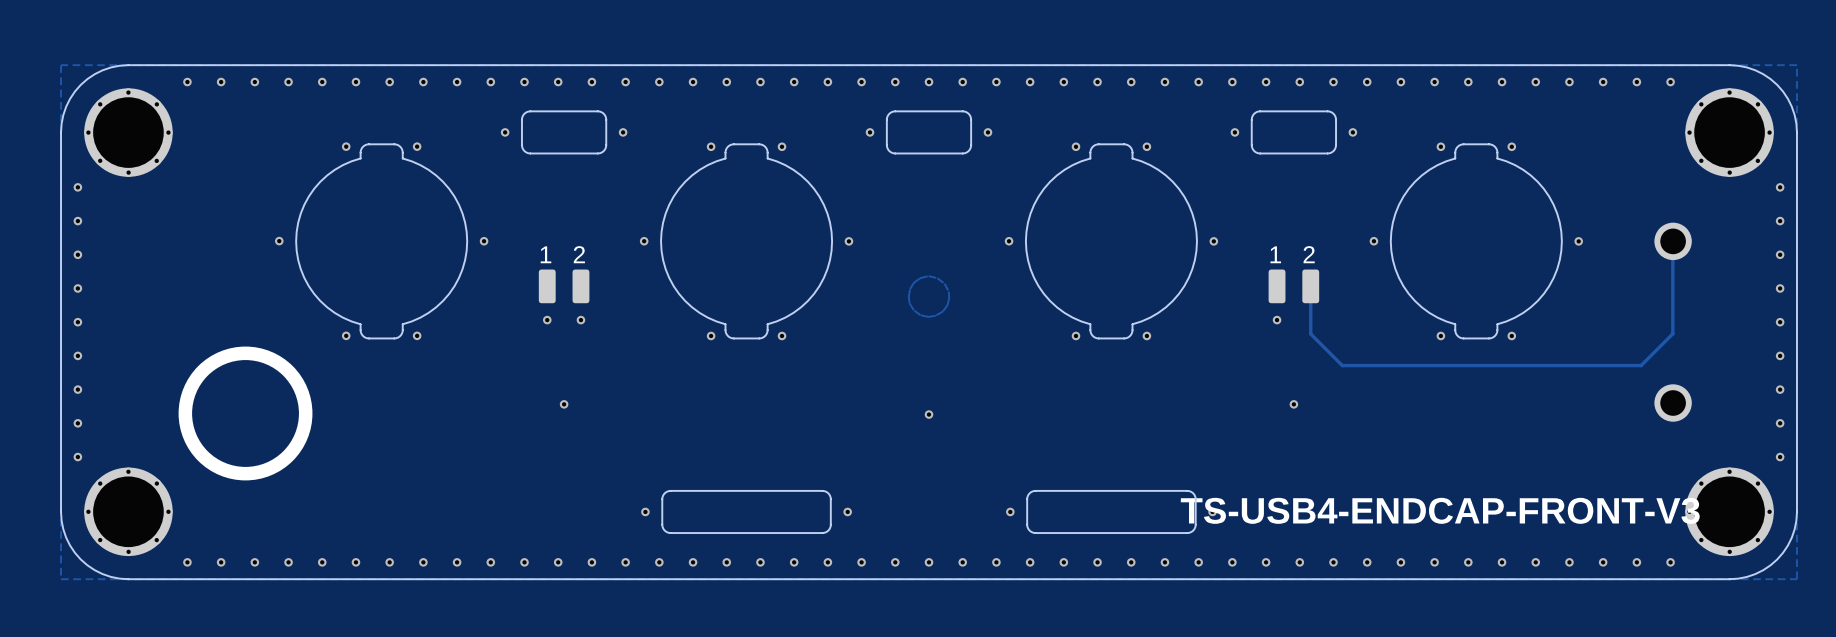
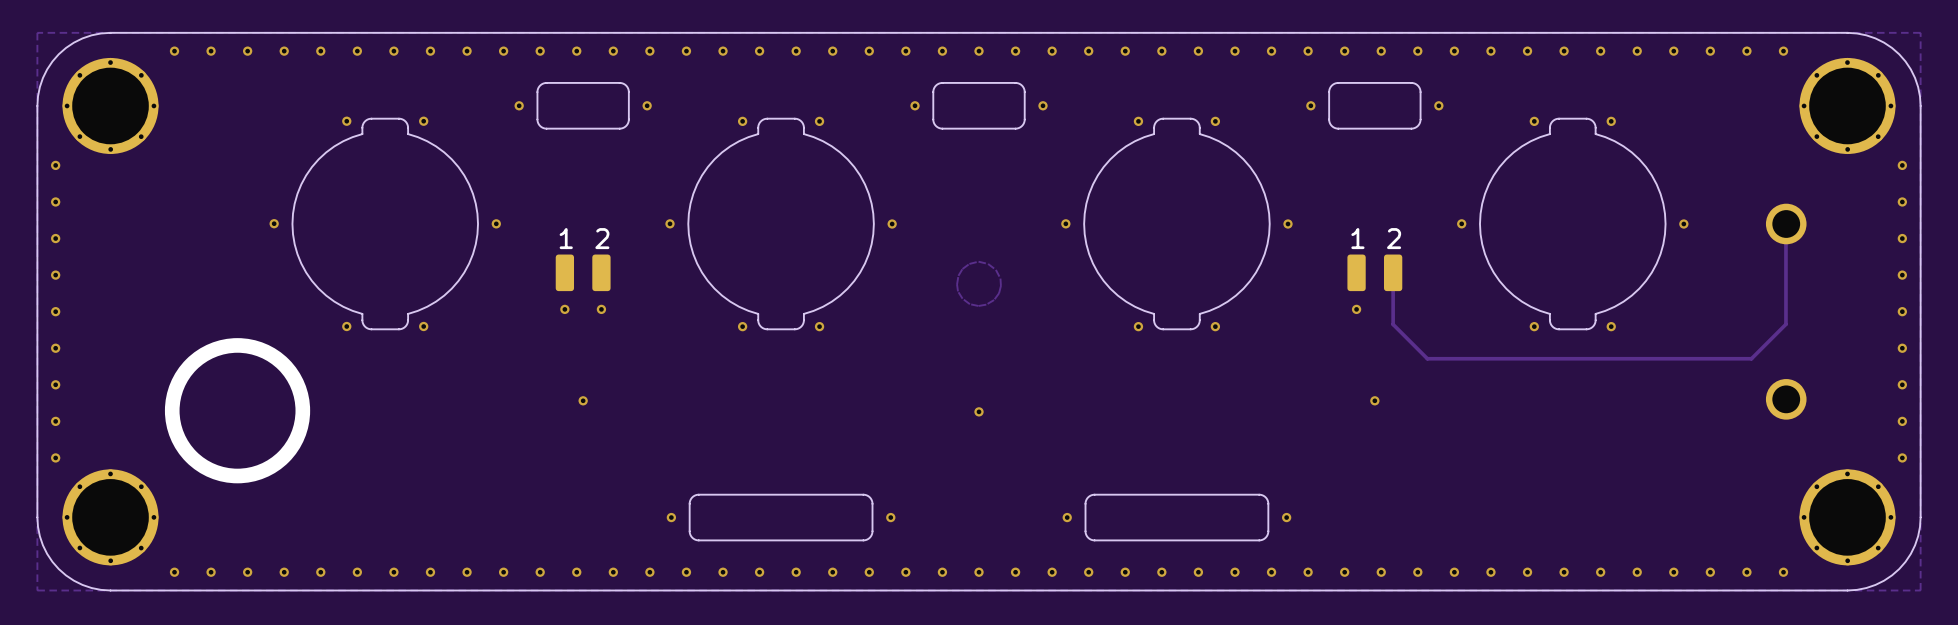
text: TS-USB4-ENDCAP-FRONT-V3 (1440, 510) -> none

